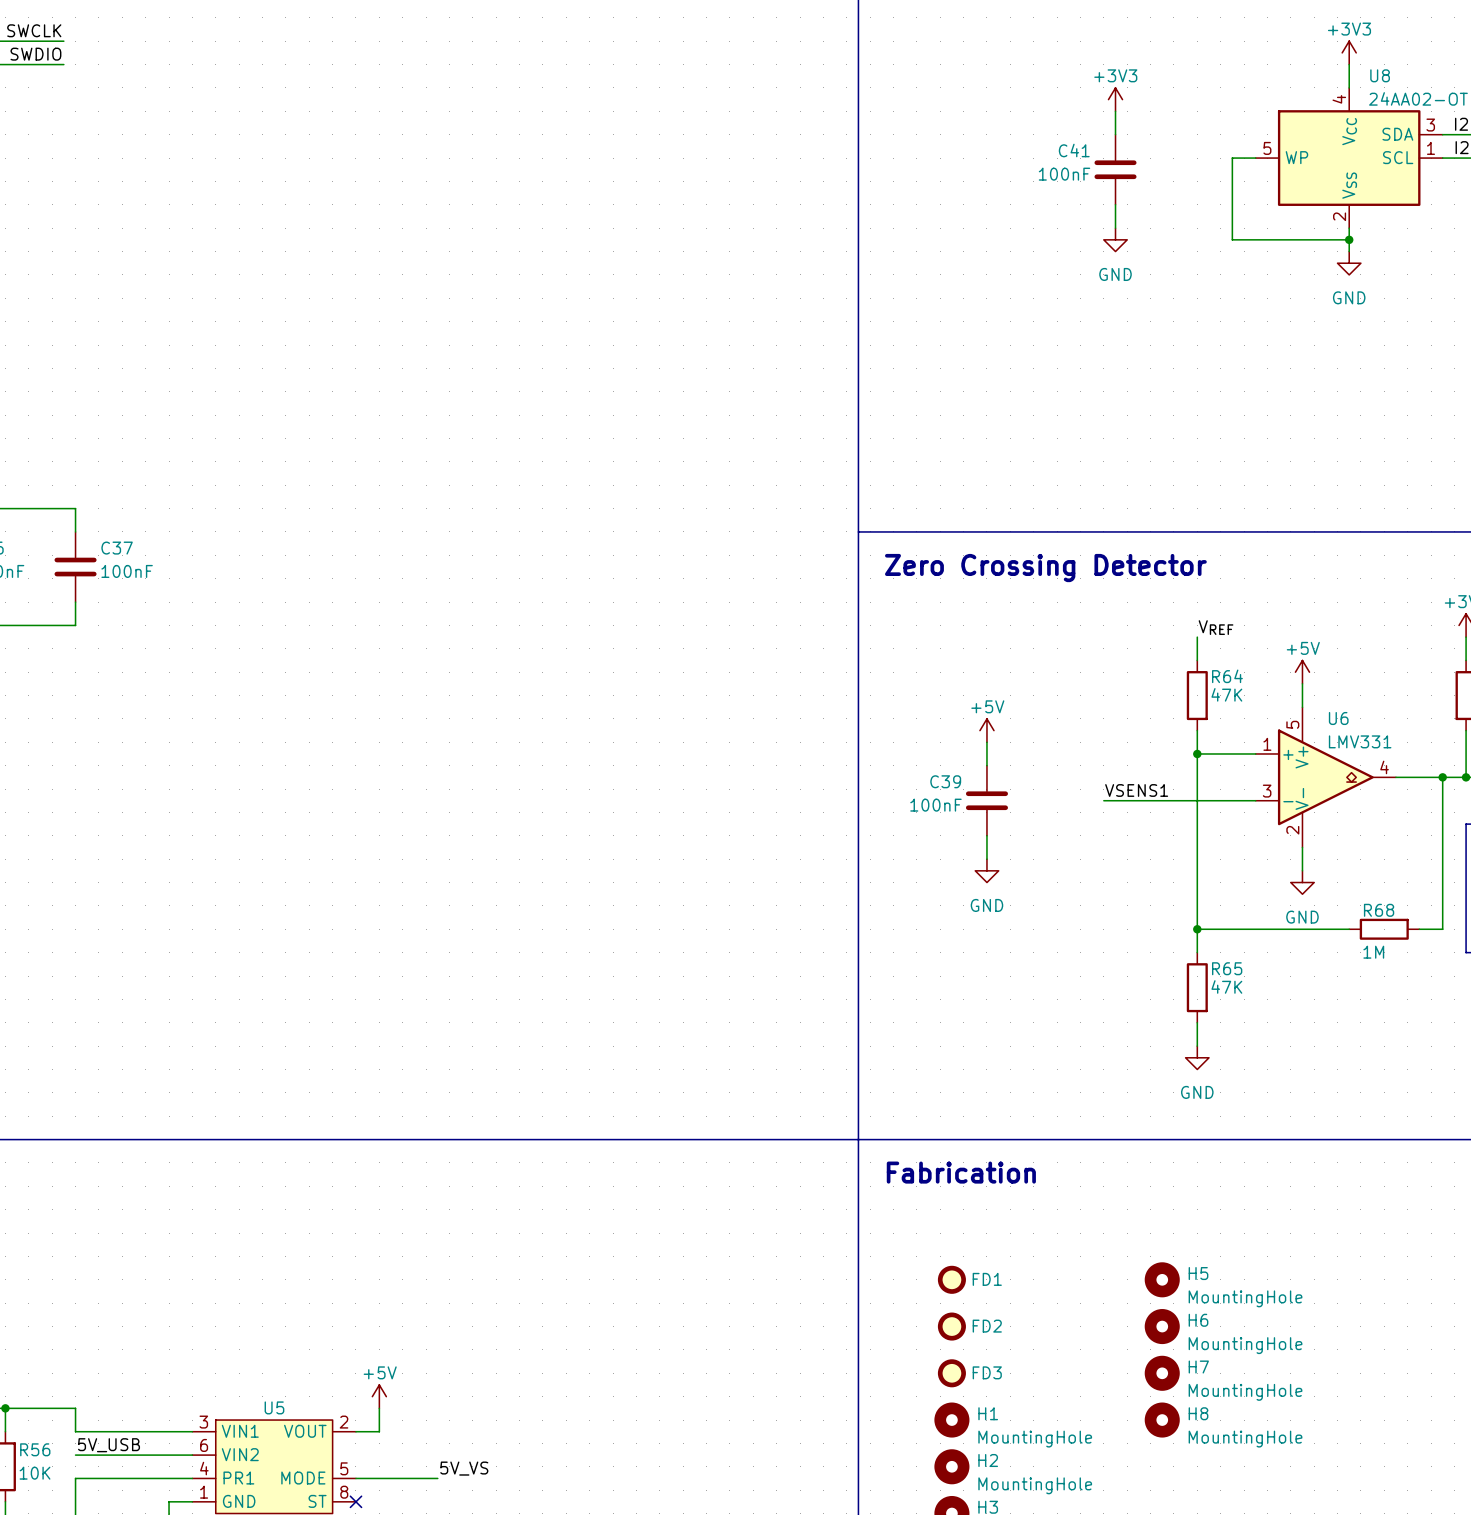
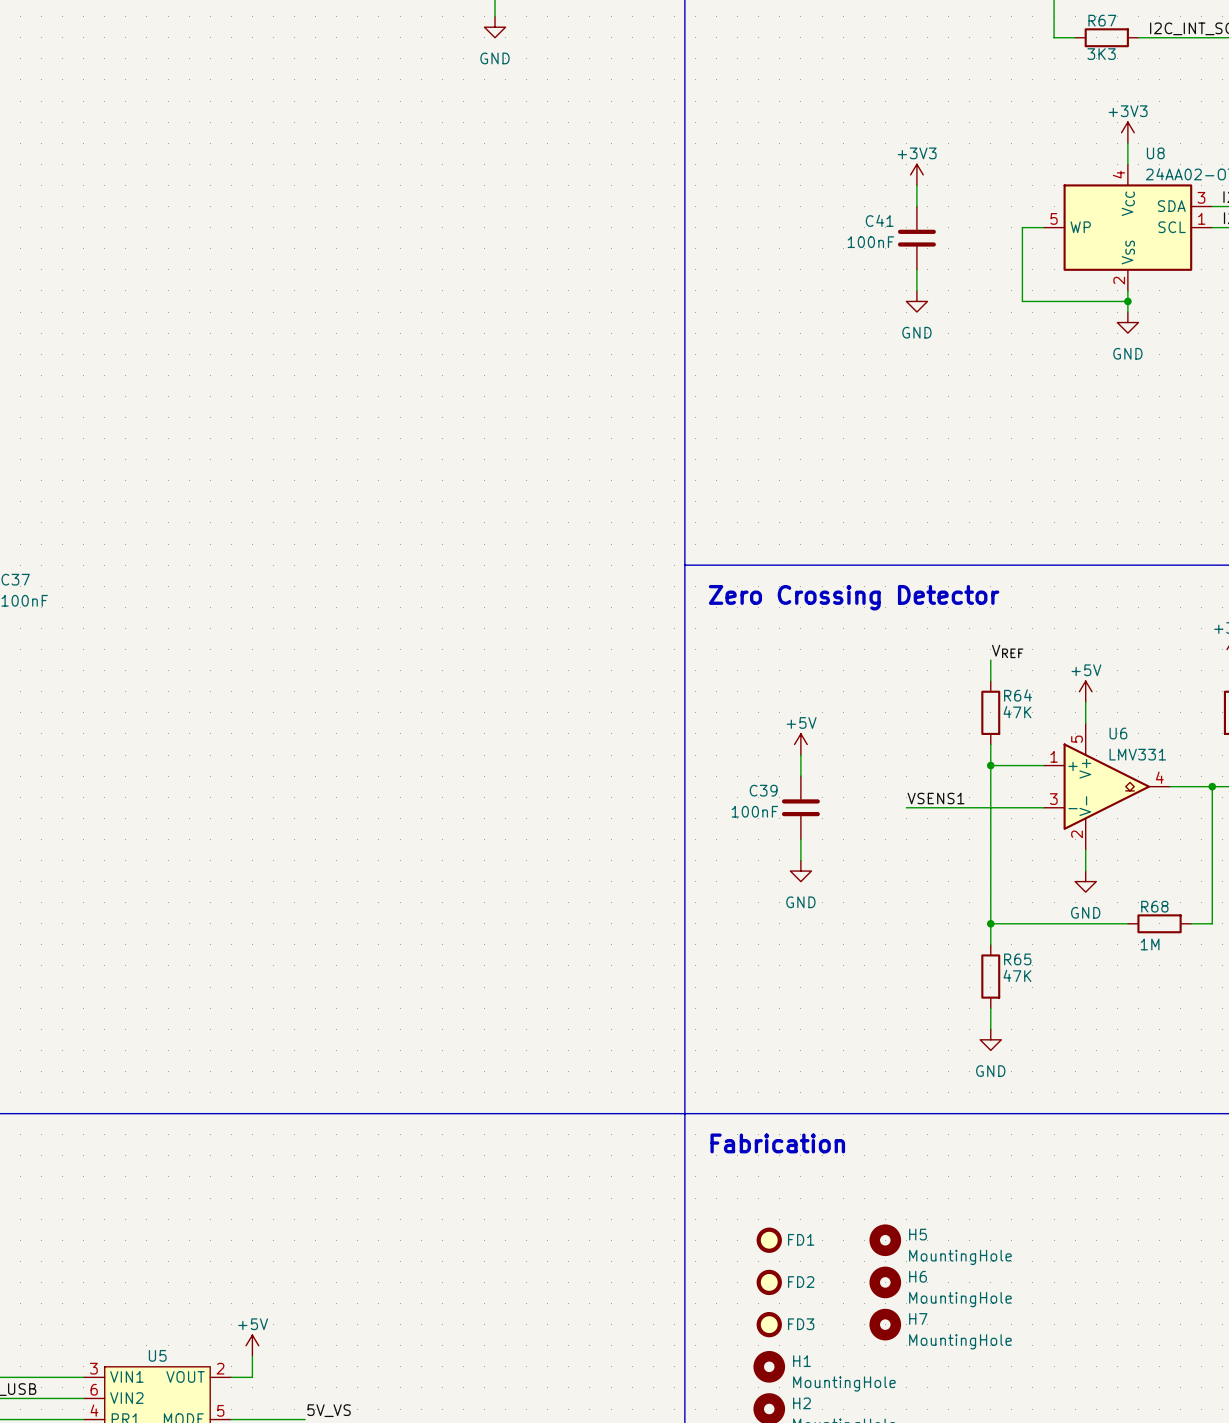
H5 position: (1162, 1279) -> (885, 1240)
H6 position: (1162, 1326) -> (885, 1282)
H7 position: (1162, 1373) -> (885, 1324)
H8: MountingHole (1162, 1420) -> none

